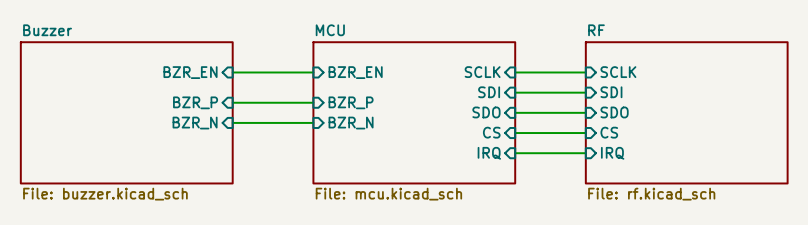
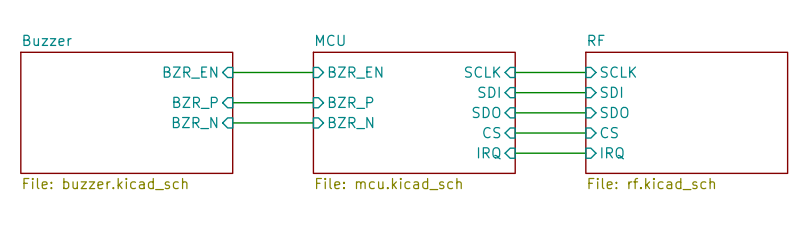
sheet Buzzer shape: [20, 41, 234, 185] -> [20, 51, 234, 174]
sheet MCU shape: [312, 41, 516, 185] -> [312, 51, 516, 174]
sheet RF shape: [585, 41, 789, 185] -> [585, 51, 789, 174]

